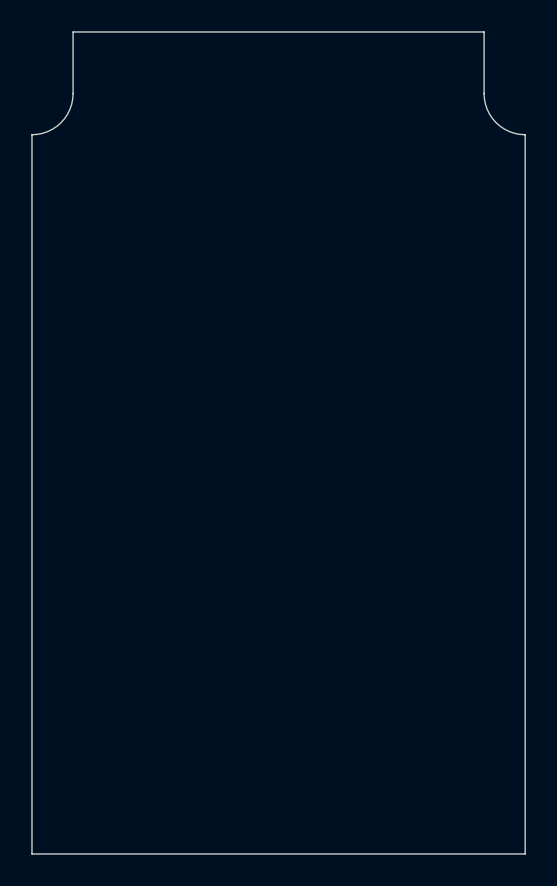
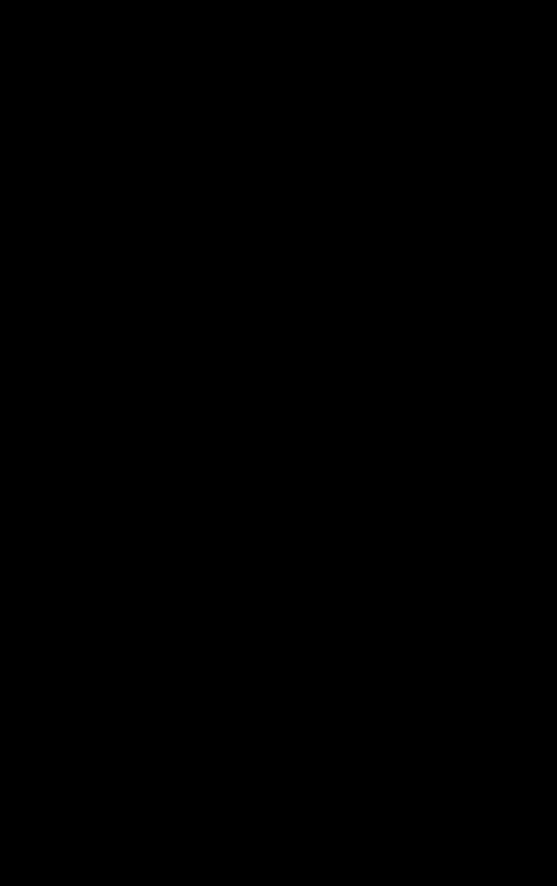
board edge: (73, 31) (73, 93) (69, 109) (57, 126) (42, 133) (31, 134) (31, 853) (525, 853) (525, 134) (514, 133) (500, 126) (487, 109) (484, 93) (484, 31) (73, 31) -> none

